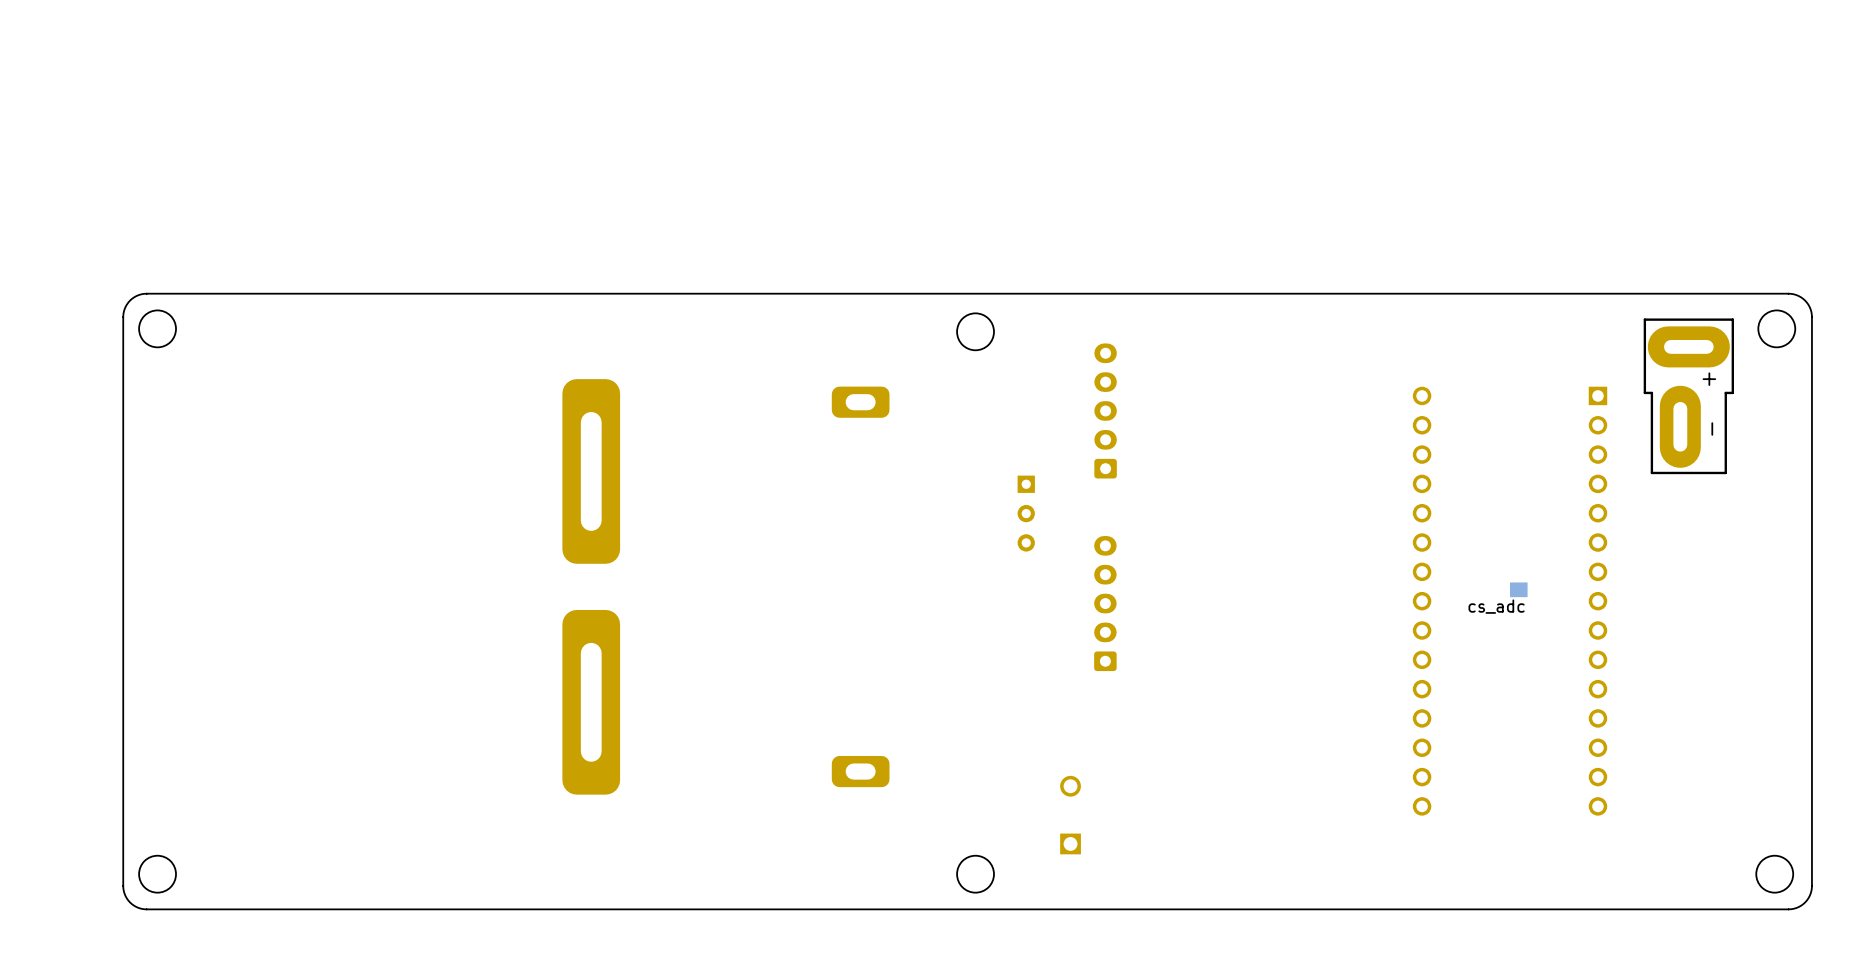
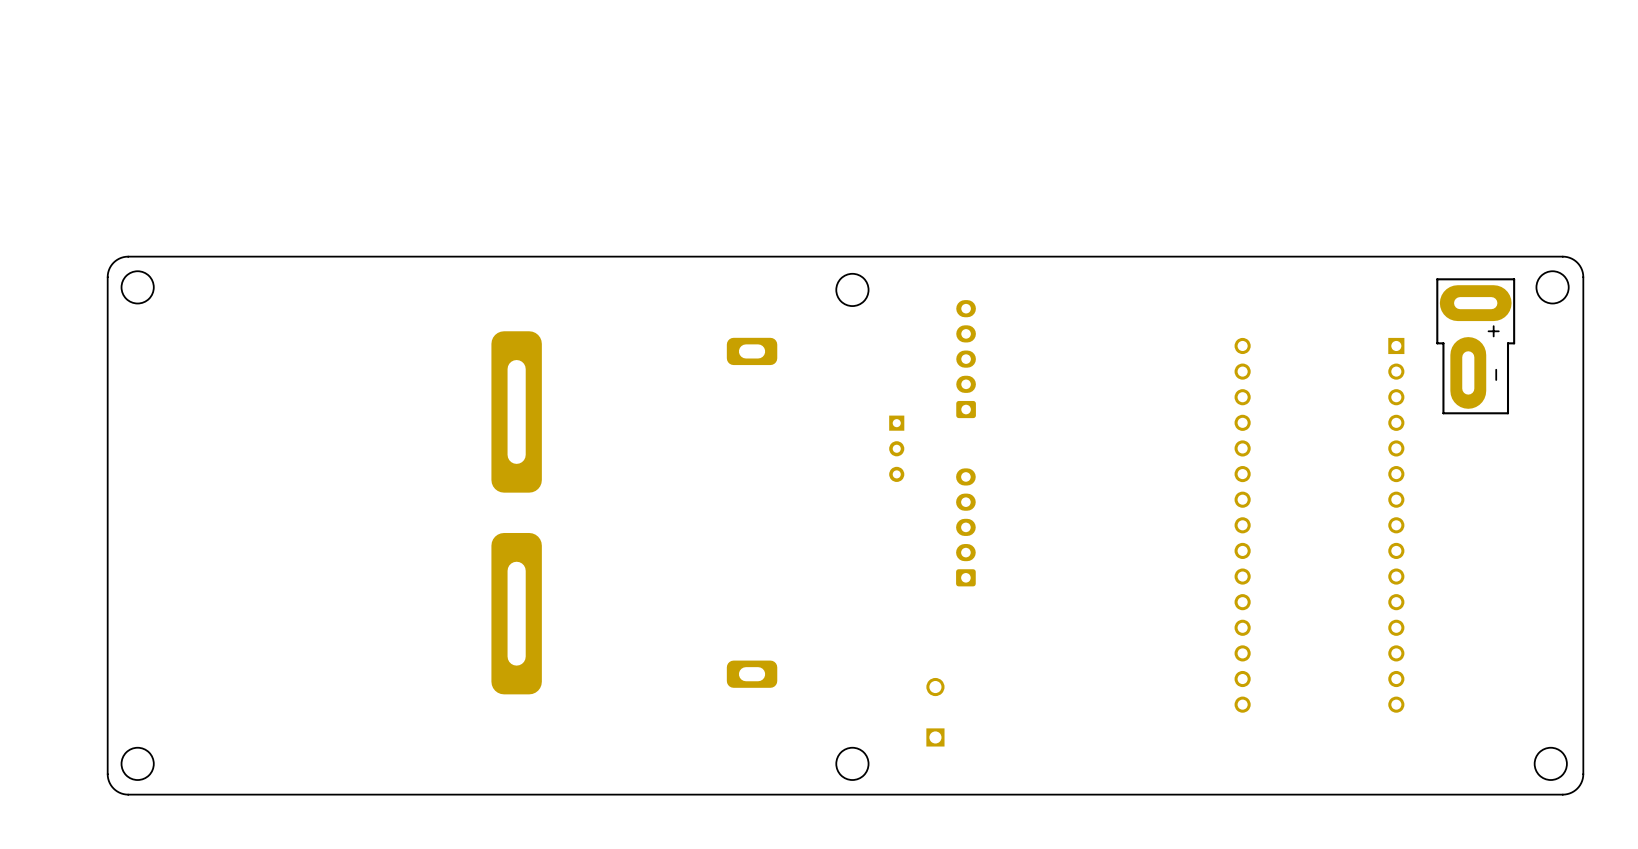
part: (1518, 589) -> none
text: cs_adc (1496, 606) -> none

